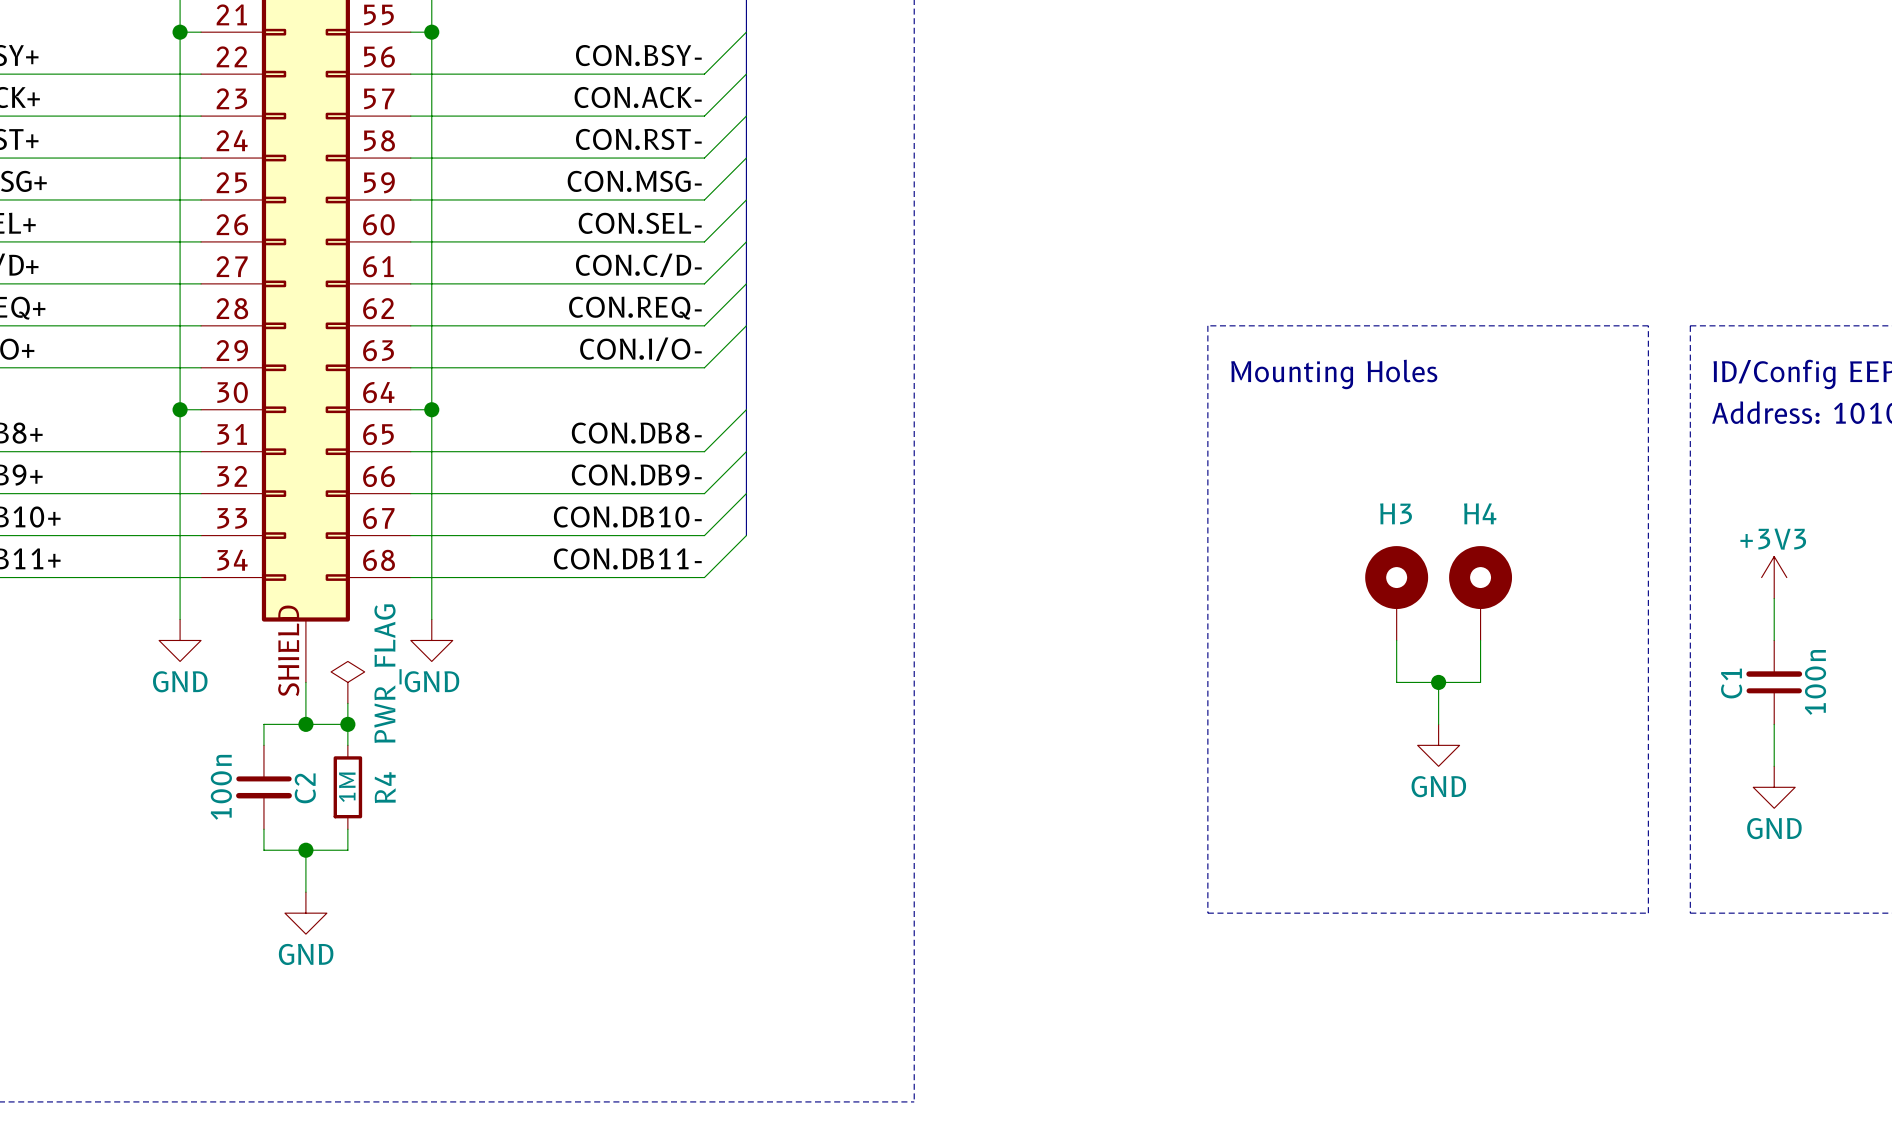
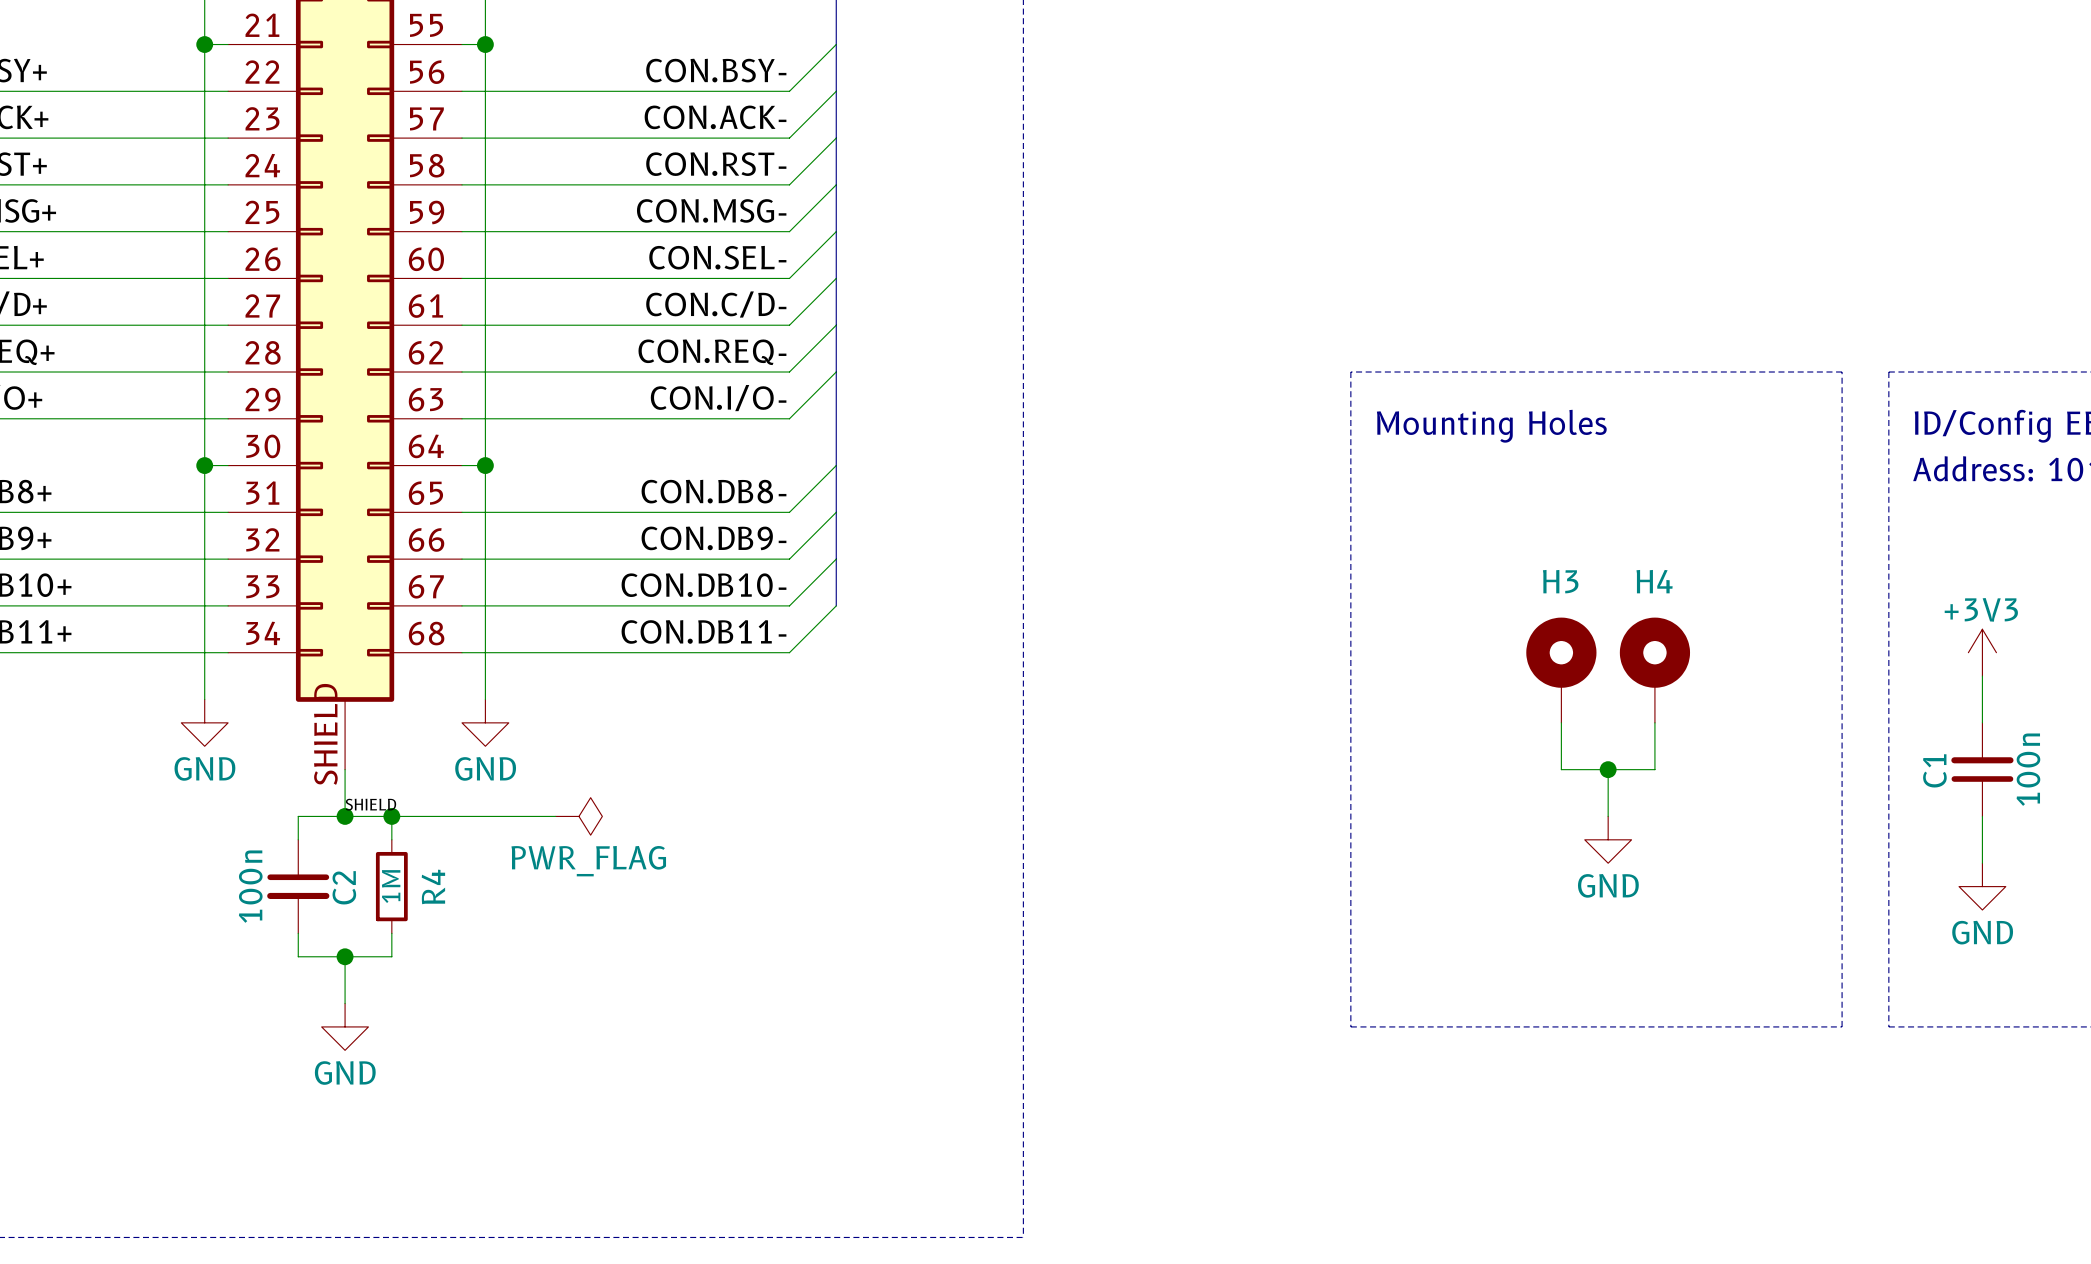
power symbol rotation: 0° (347, 682) -> 90° clockwise (578, 816)
power symbol position: PWR_FLAG (347, 682) -> PWR_FLAG (578, 816)
wire: (347, 703) (347, 724) -> (555, 816) (391, 816)
label: none -> SHIELD (370, 804)

